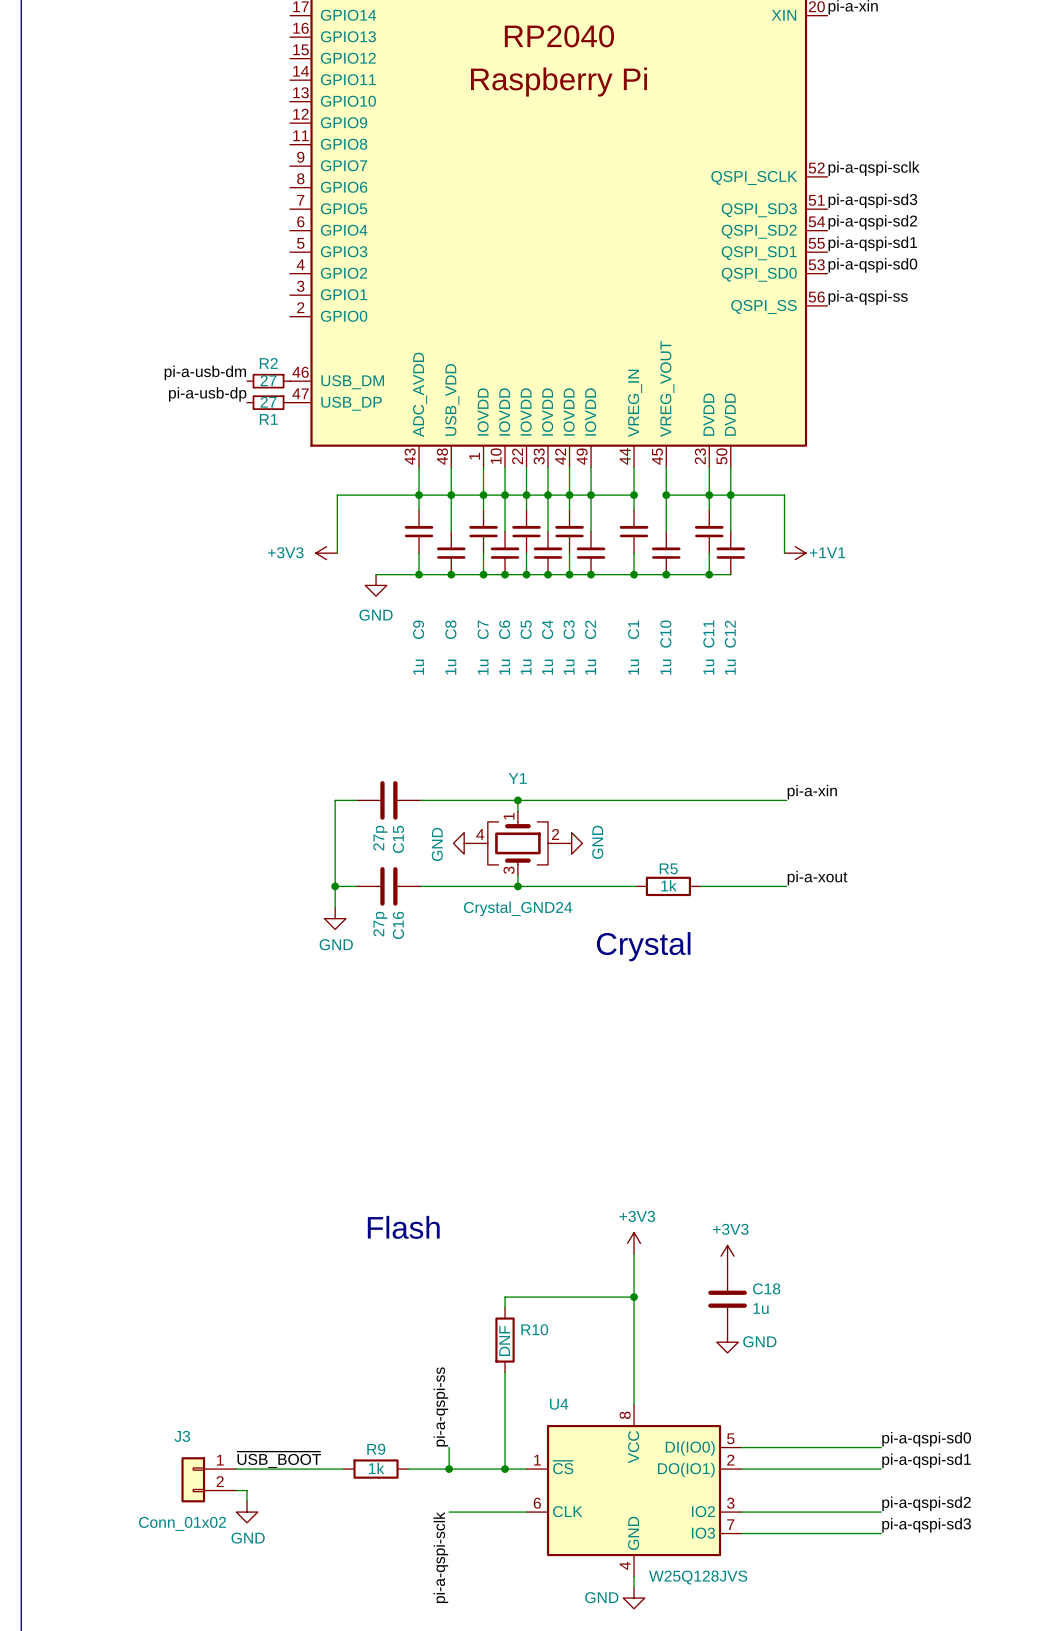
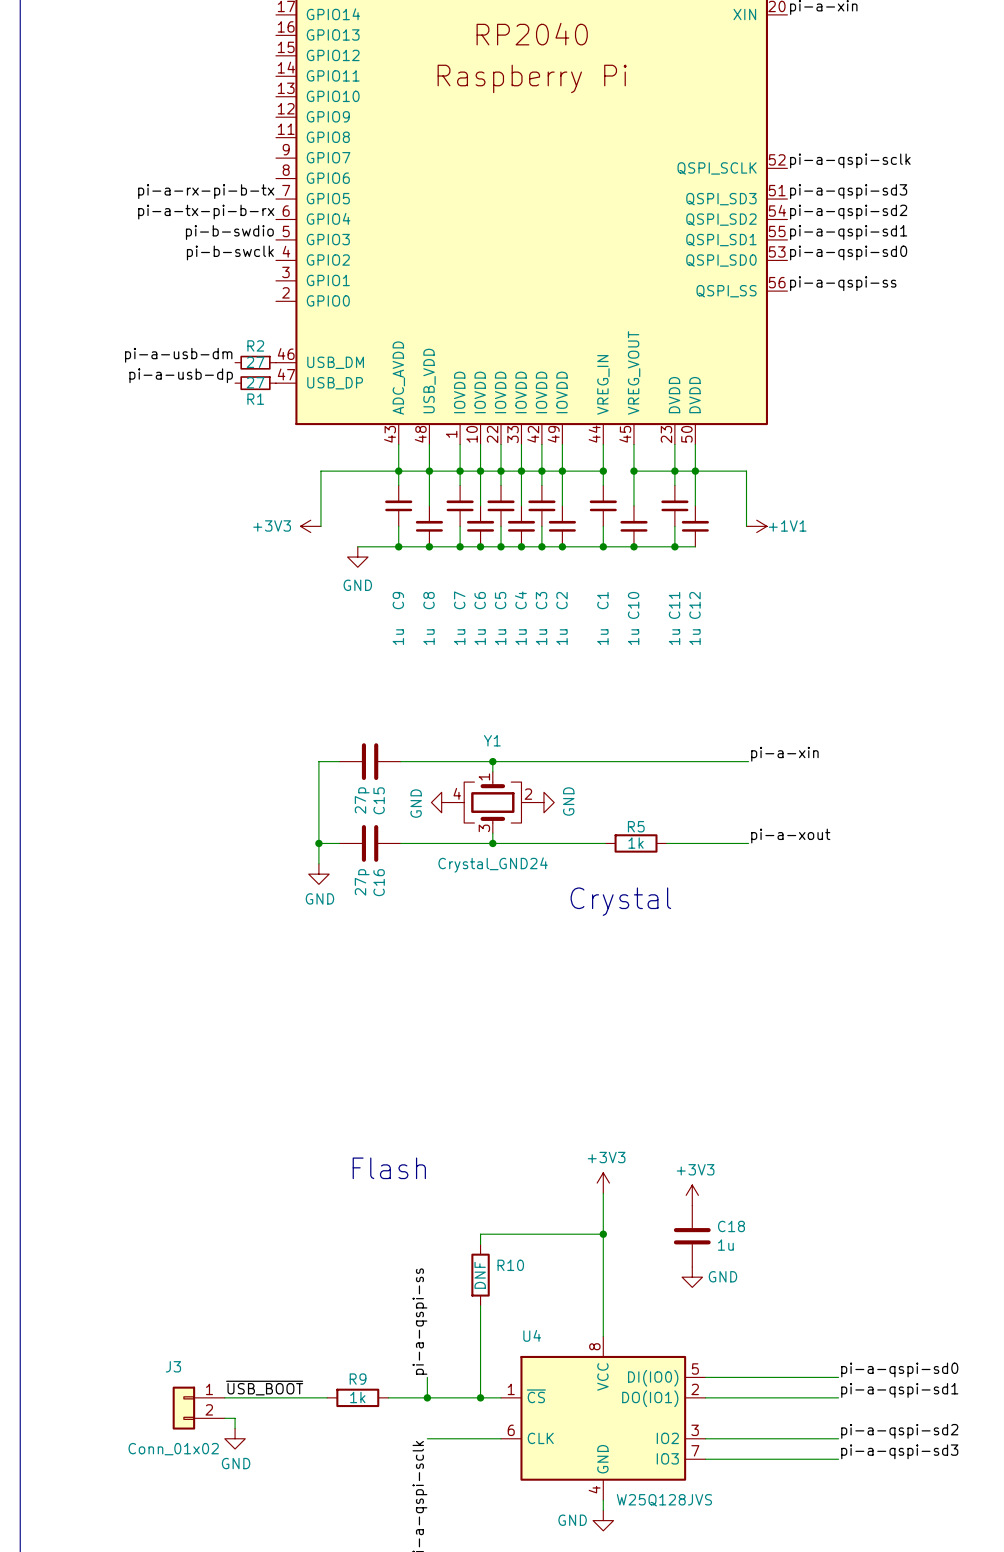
label: none -> pi-a-rx-pi-b-tx (206, 191)
label: none -> pi-a-tx-pi-b-rx (206, 212)
label: none -> pi-b-swdio (229, 232)
label: none -> pi-b-swclk (230, 252)

